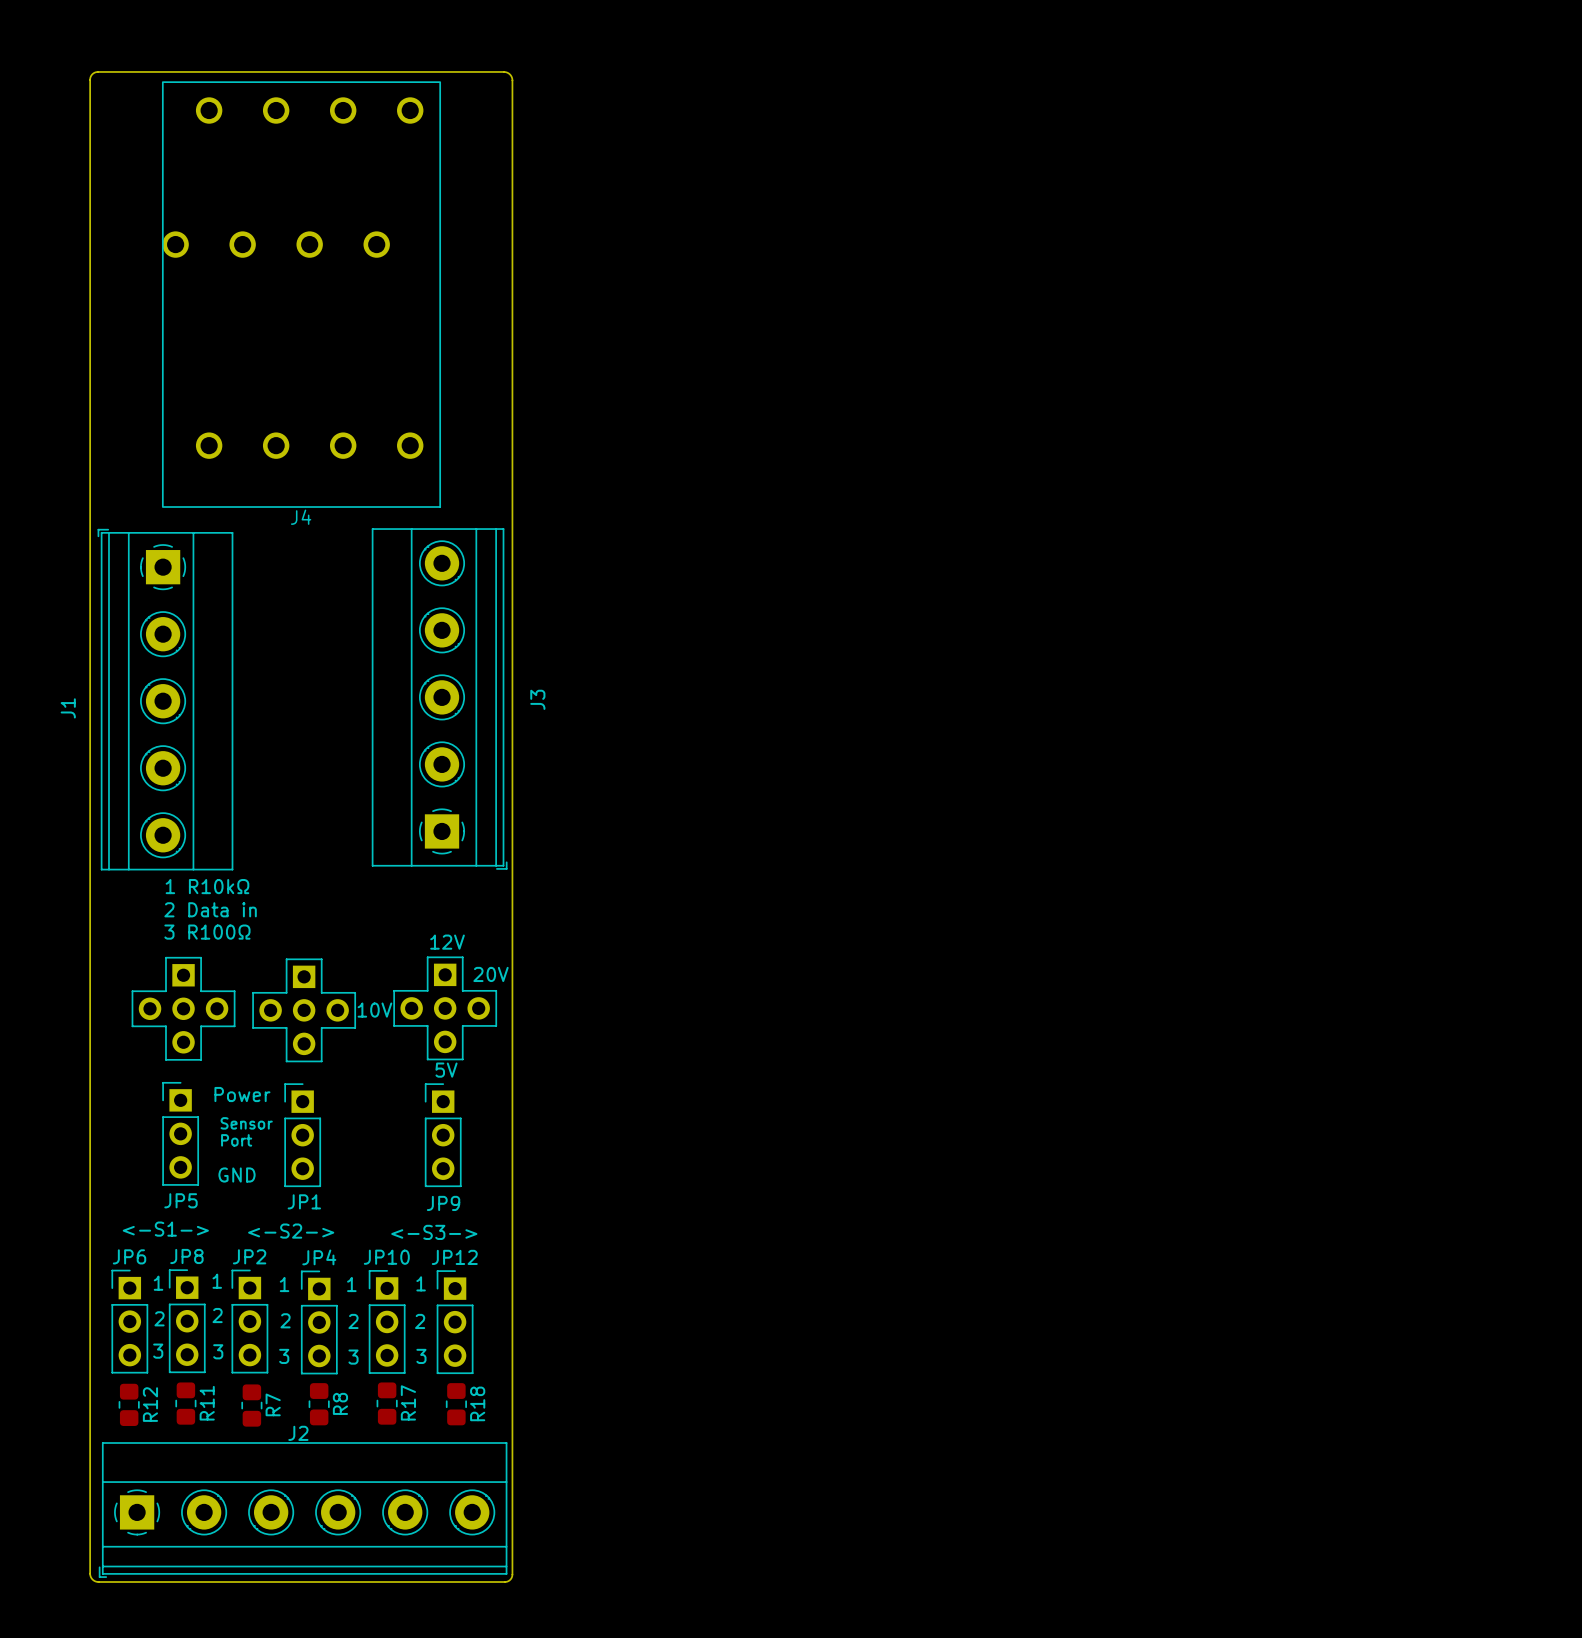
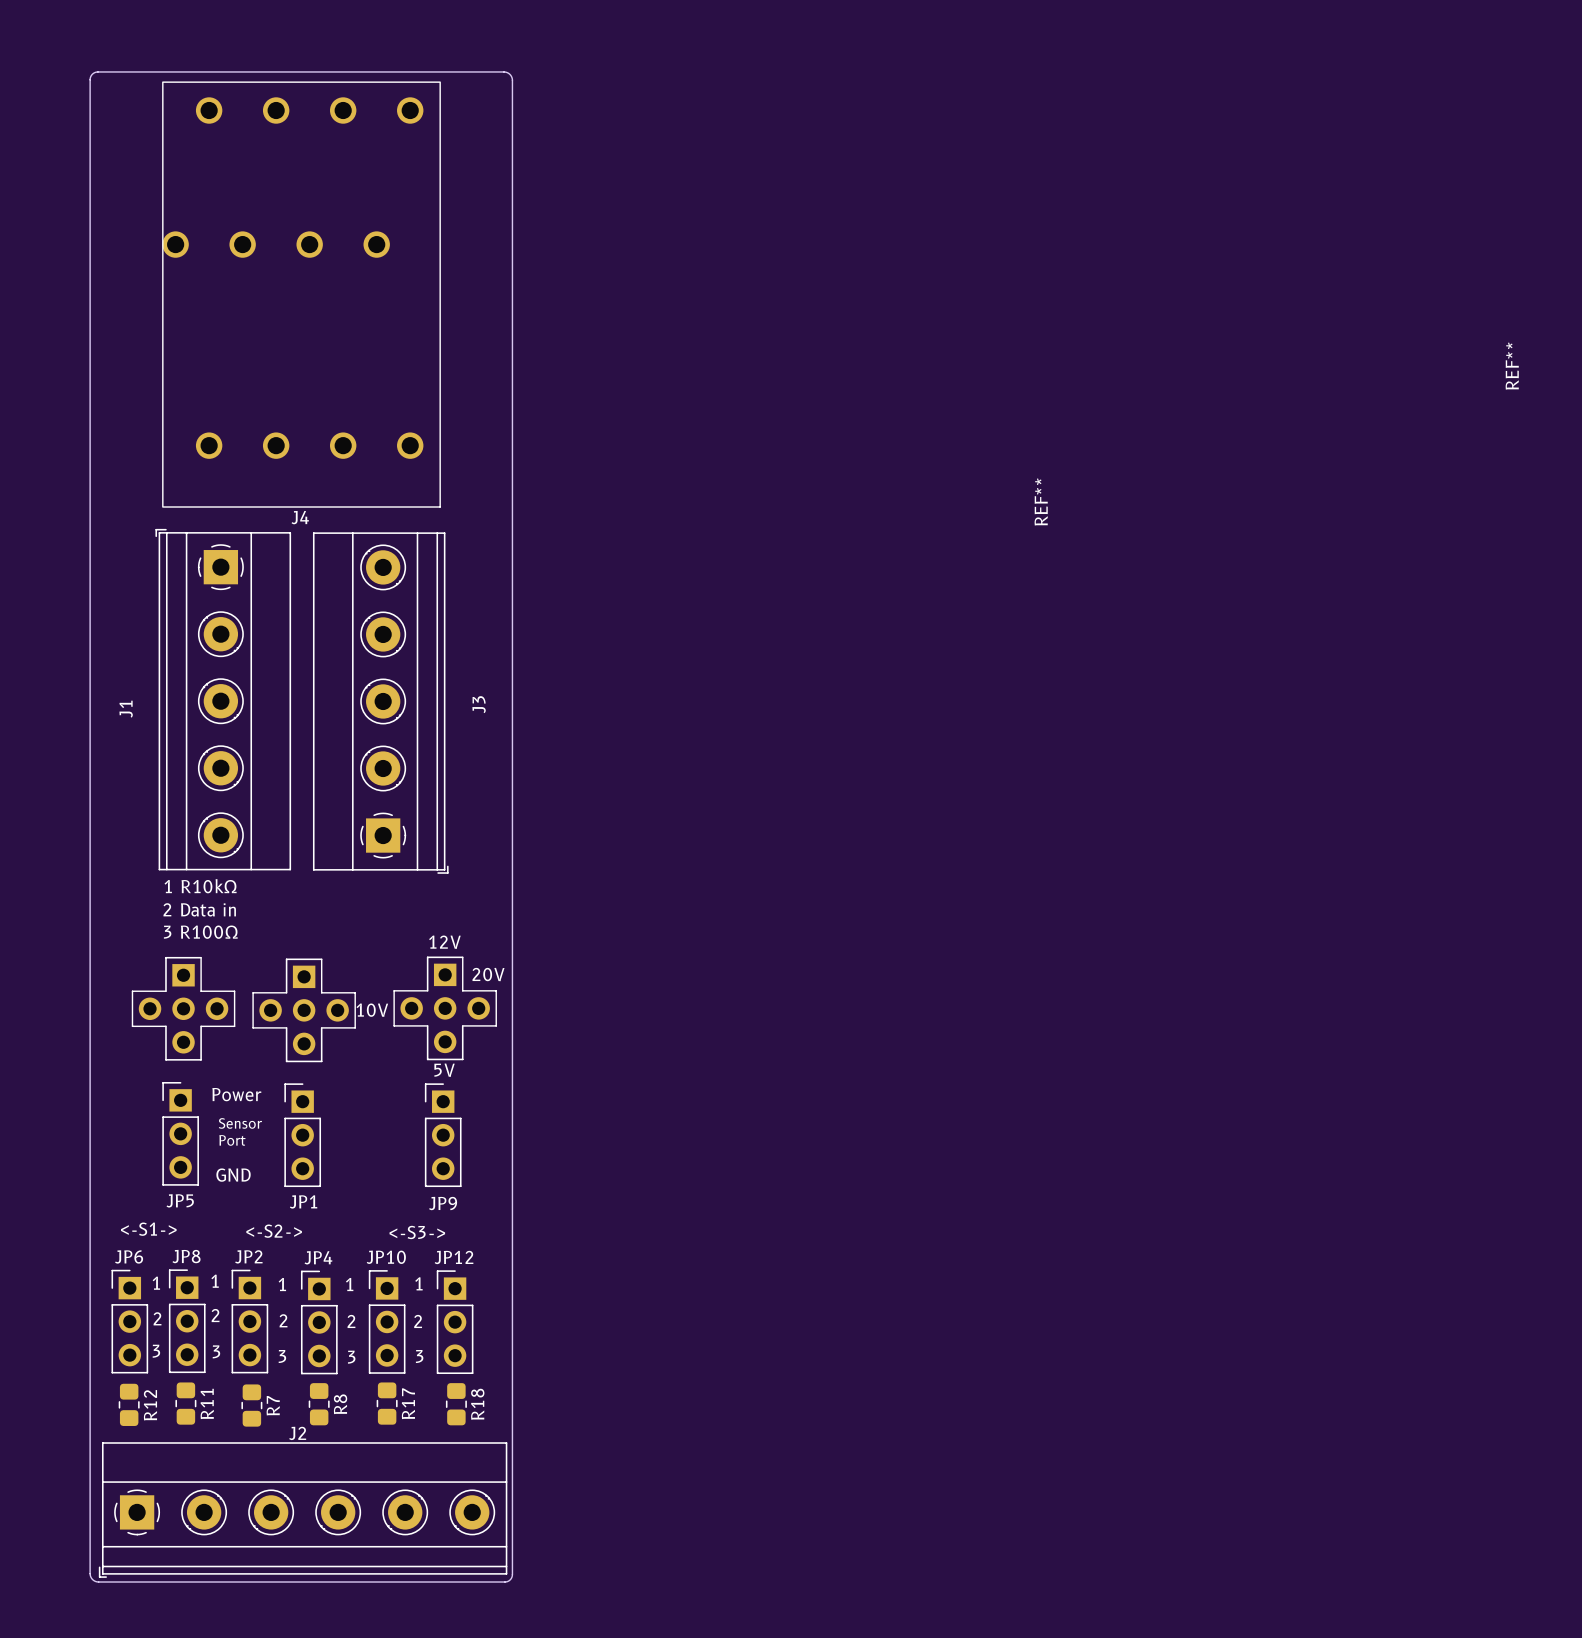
REF**: none -> (1512, 366)
REF**: none -> (1041, 501)
J3 position: (439, 698) -> (380, 703)
J1 position: (165, 699) -> (223, 699)

